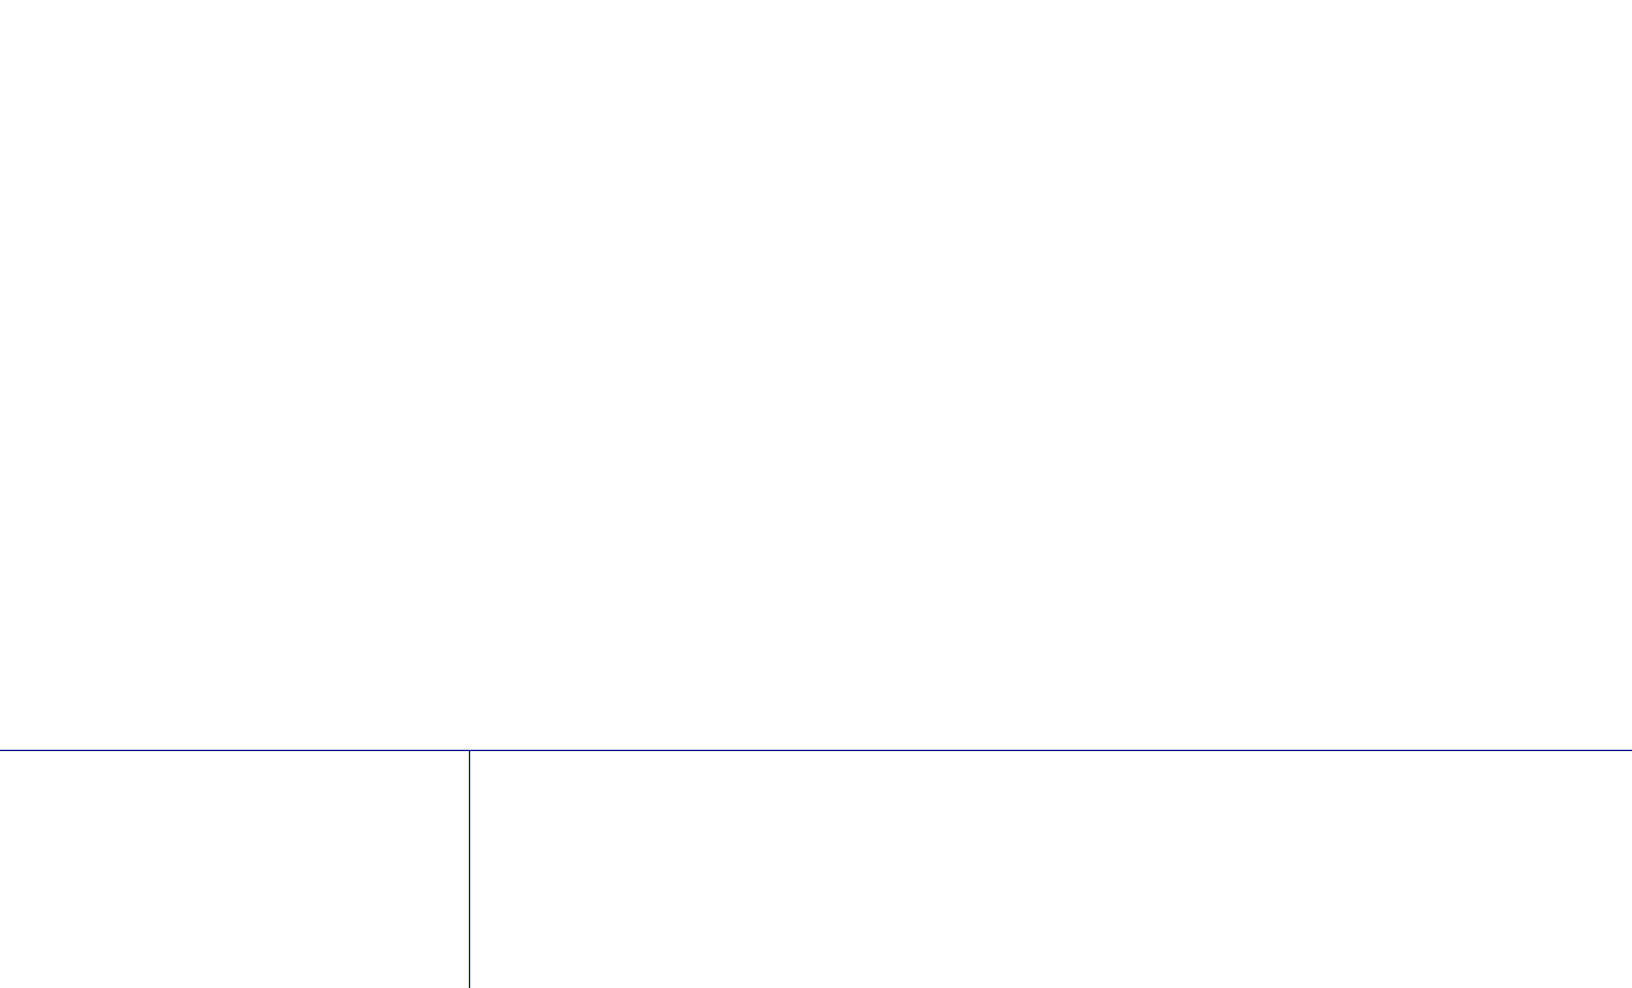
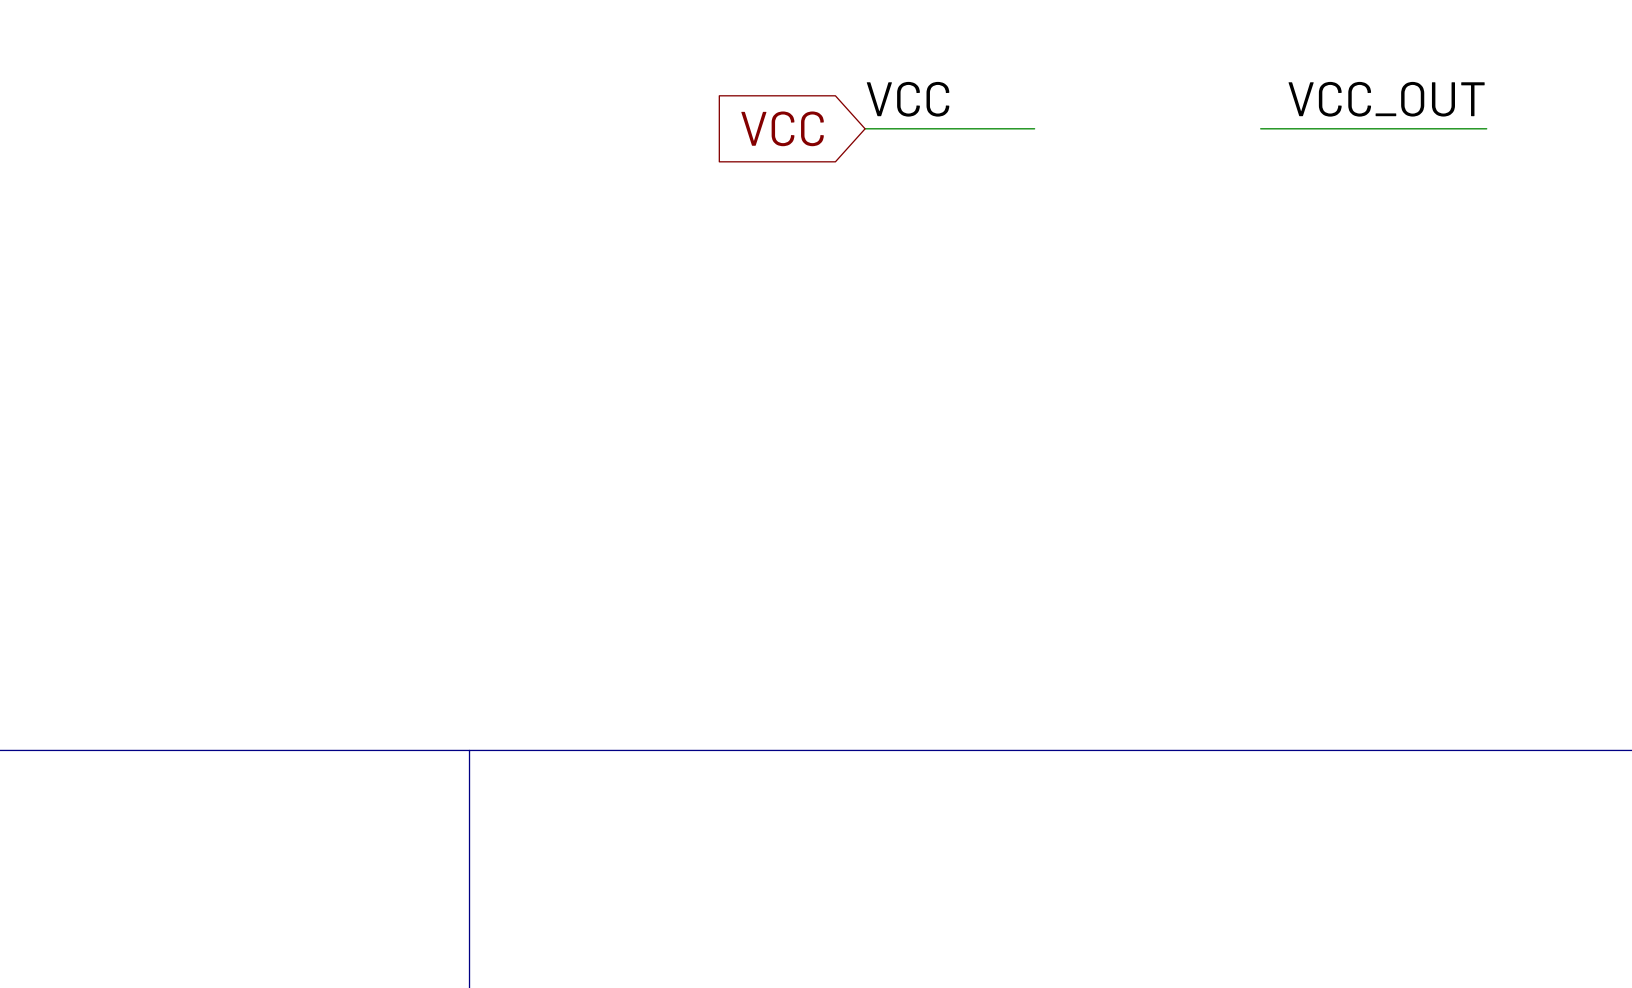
label: none -> VCC (908, 99)
label: none -> VCC_OUT (1386, 99)
global label: none -> VCC (782, 128)
wire: none -> (865, 128) (1034, 128)
wire: none -> (1260, 128) (1486, 128)

